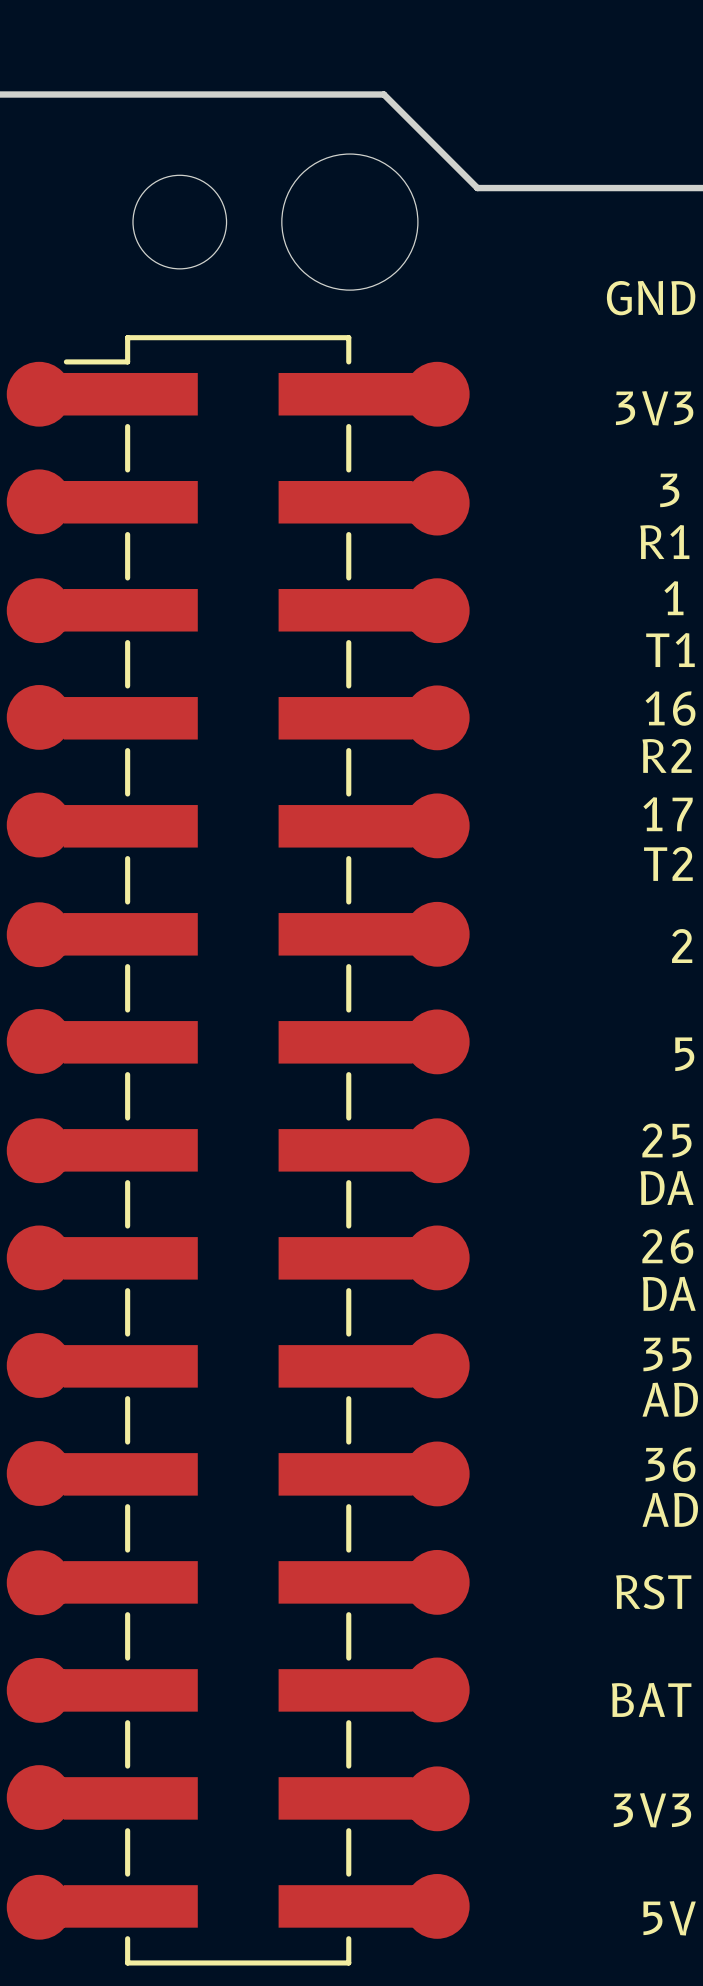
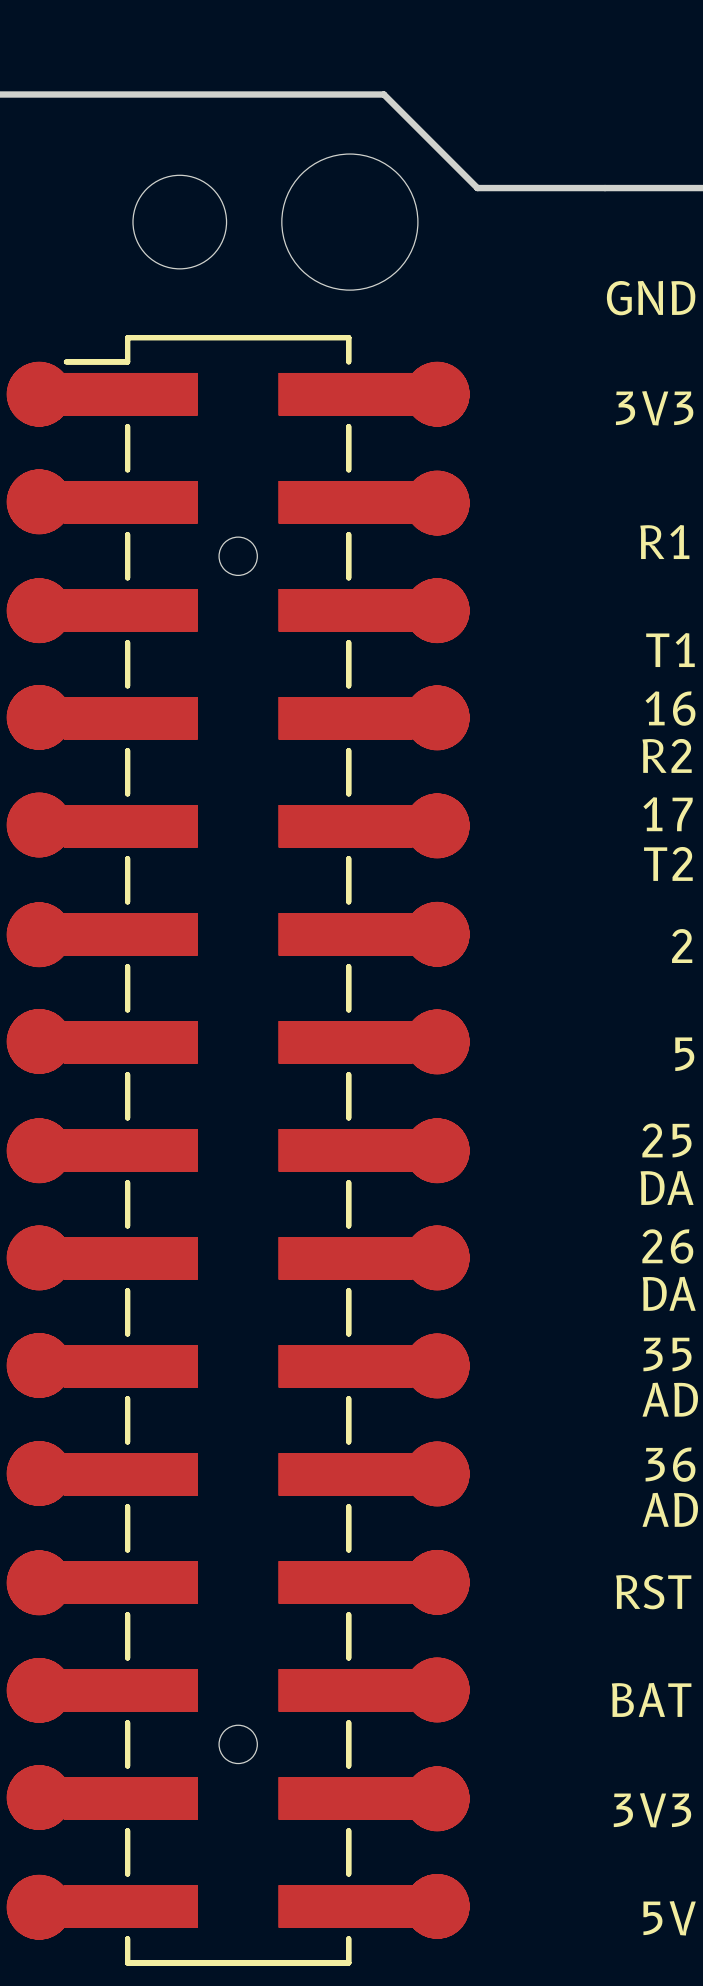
text: 3 (669, 490) -> none
text: 1 (673, 598) -> none
part: none -> (238, 1150)

